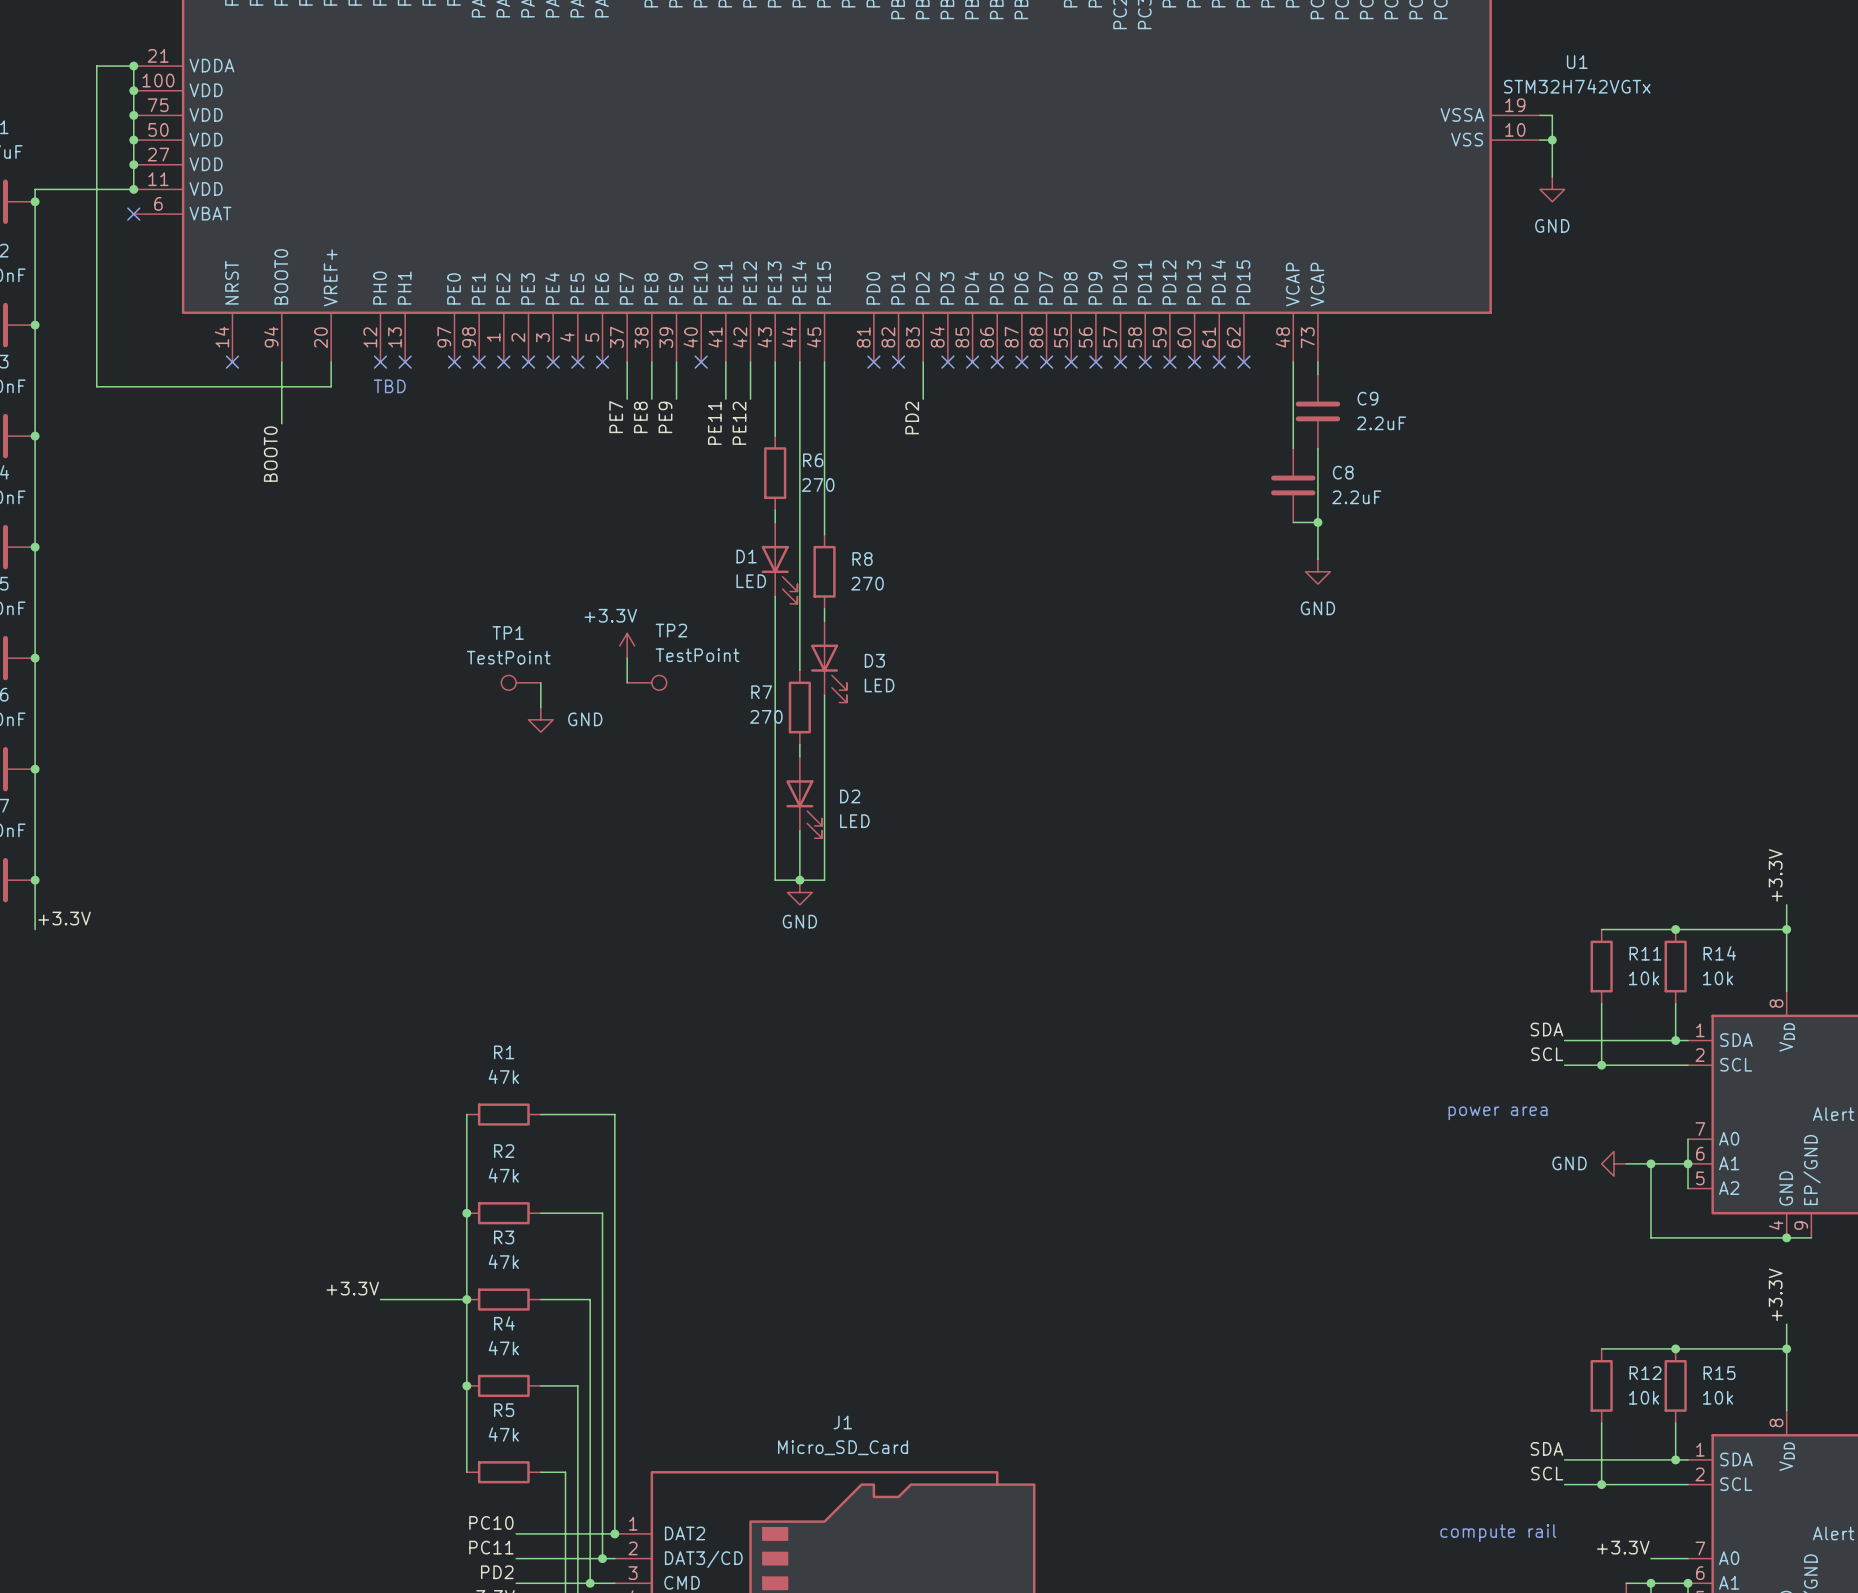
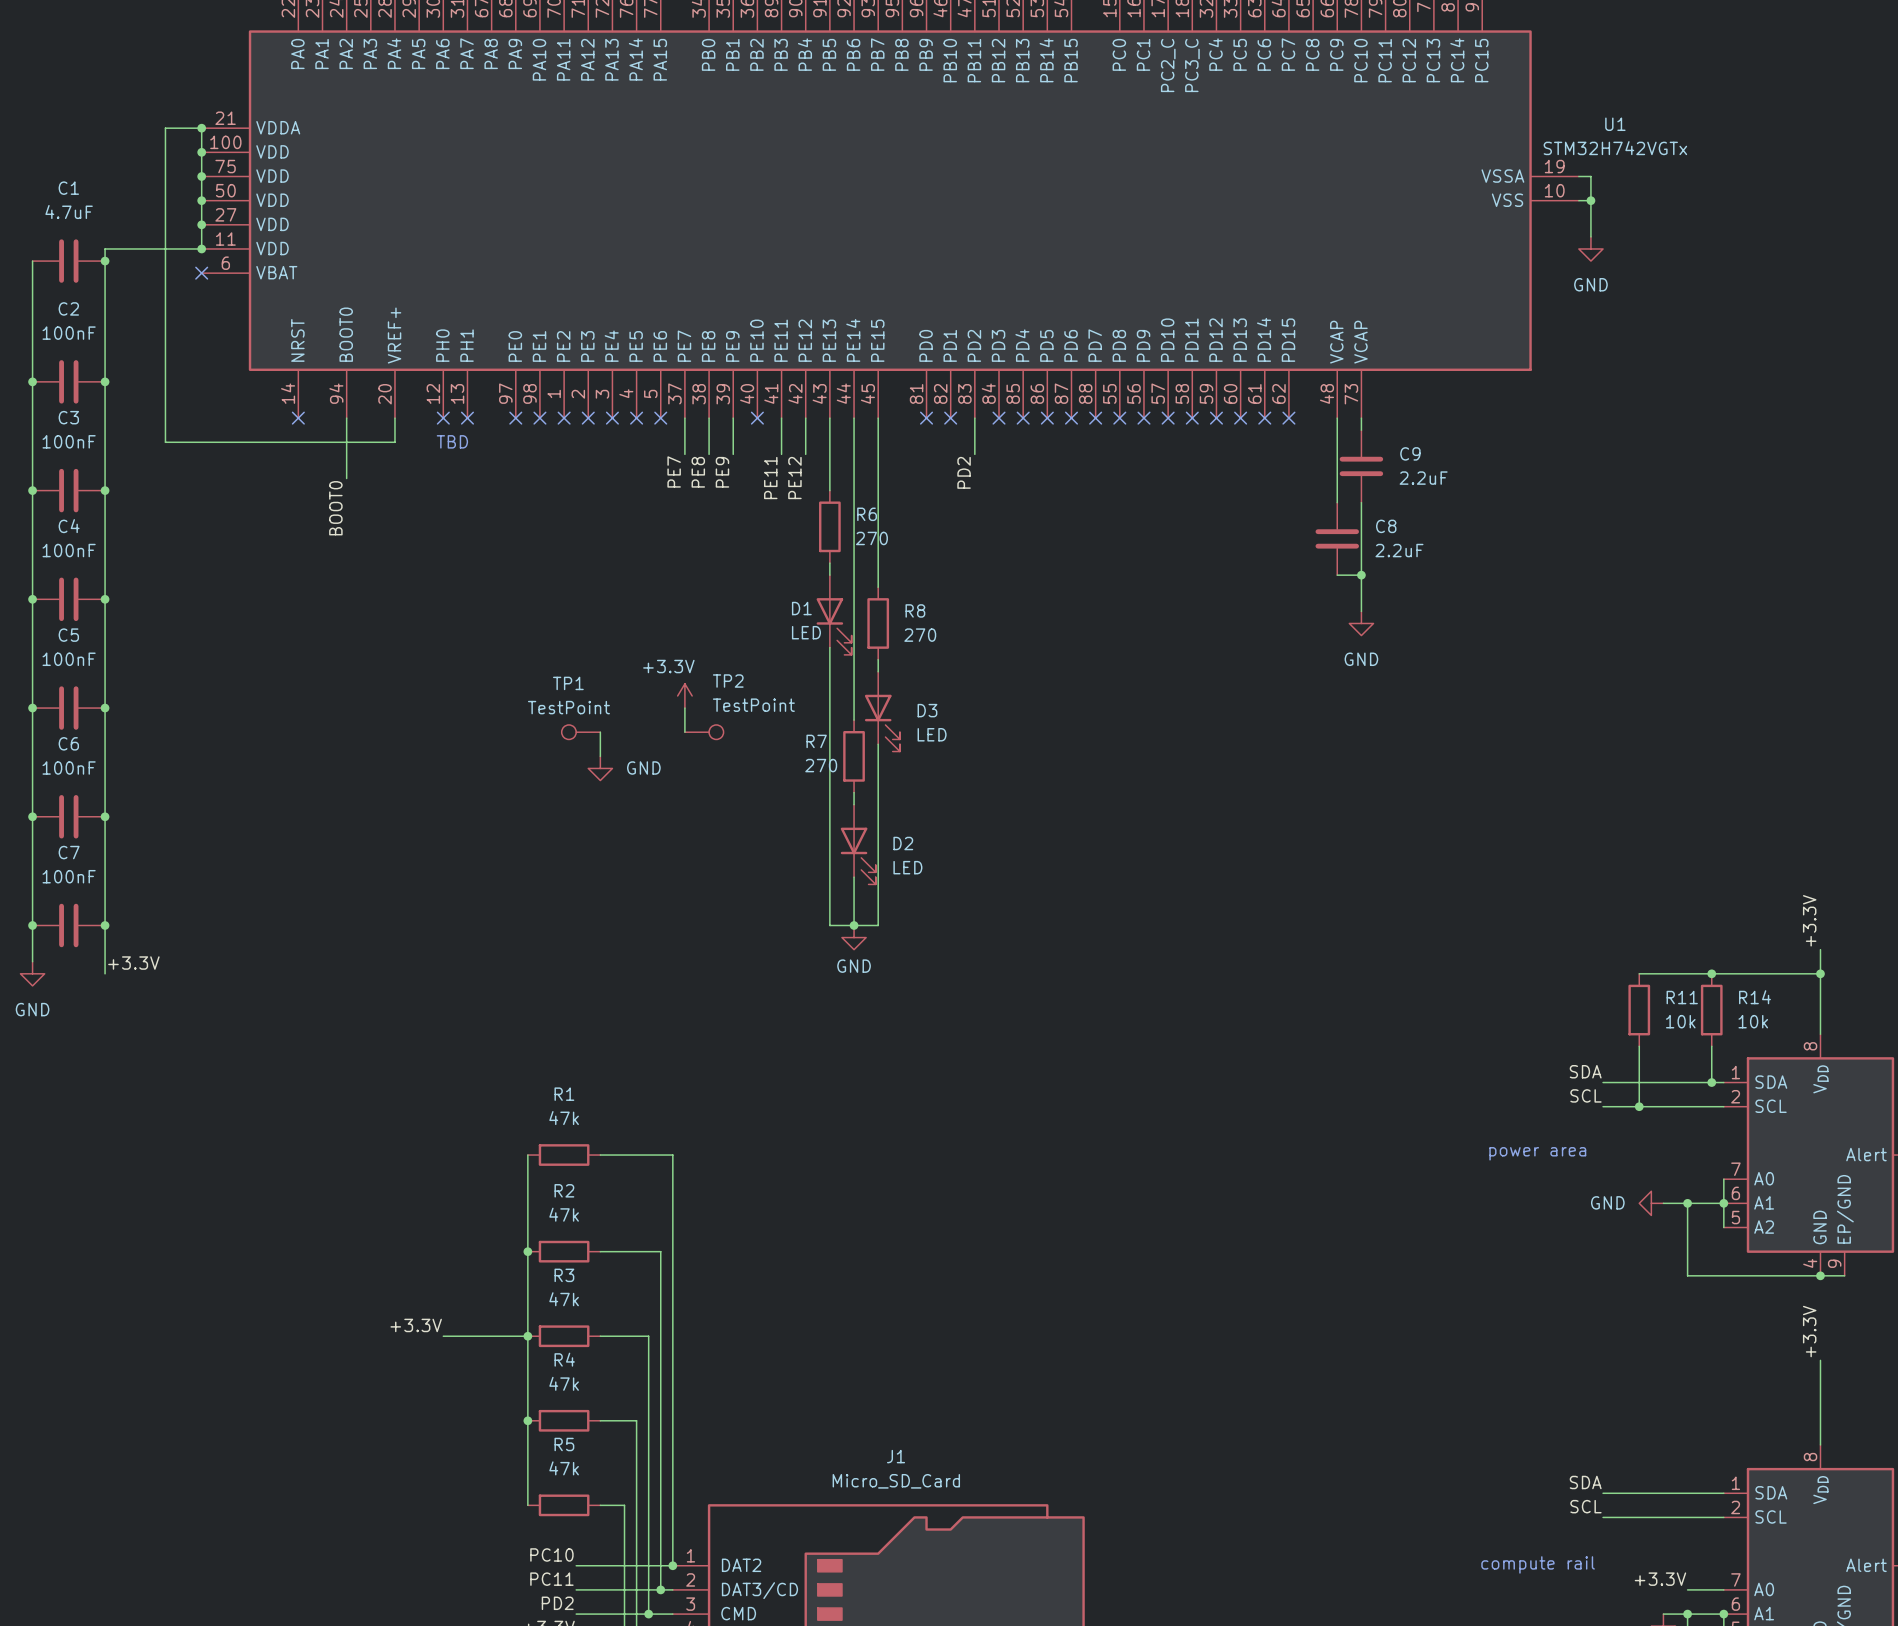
wire: (1601, 1348) (1786, 1348) -> none
junction: (1675, 1348) -> none
junction: (1786, 1348) -> none
R12: 10k (1601, 1385) -> none
R15: 10k (1675, 1385) -> none
wire: (1601, 1422) (1601, 1484) -> none
wire: (1675, 1422) (1675, 1459) -> none
junction: (1675, 1459) -> none
junction: (1601, 1484) -> none

